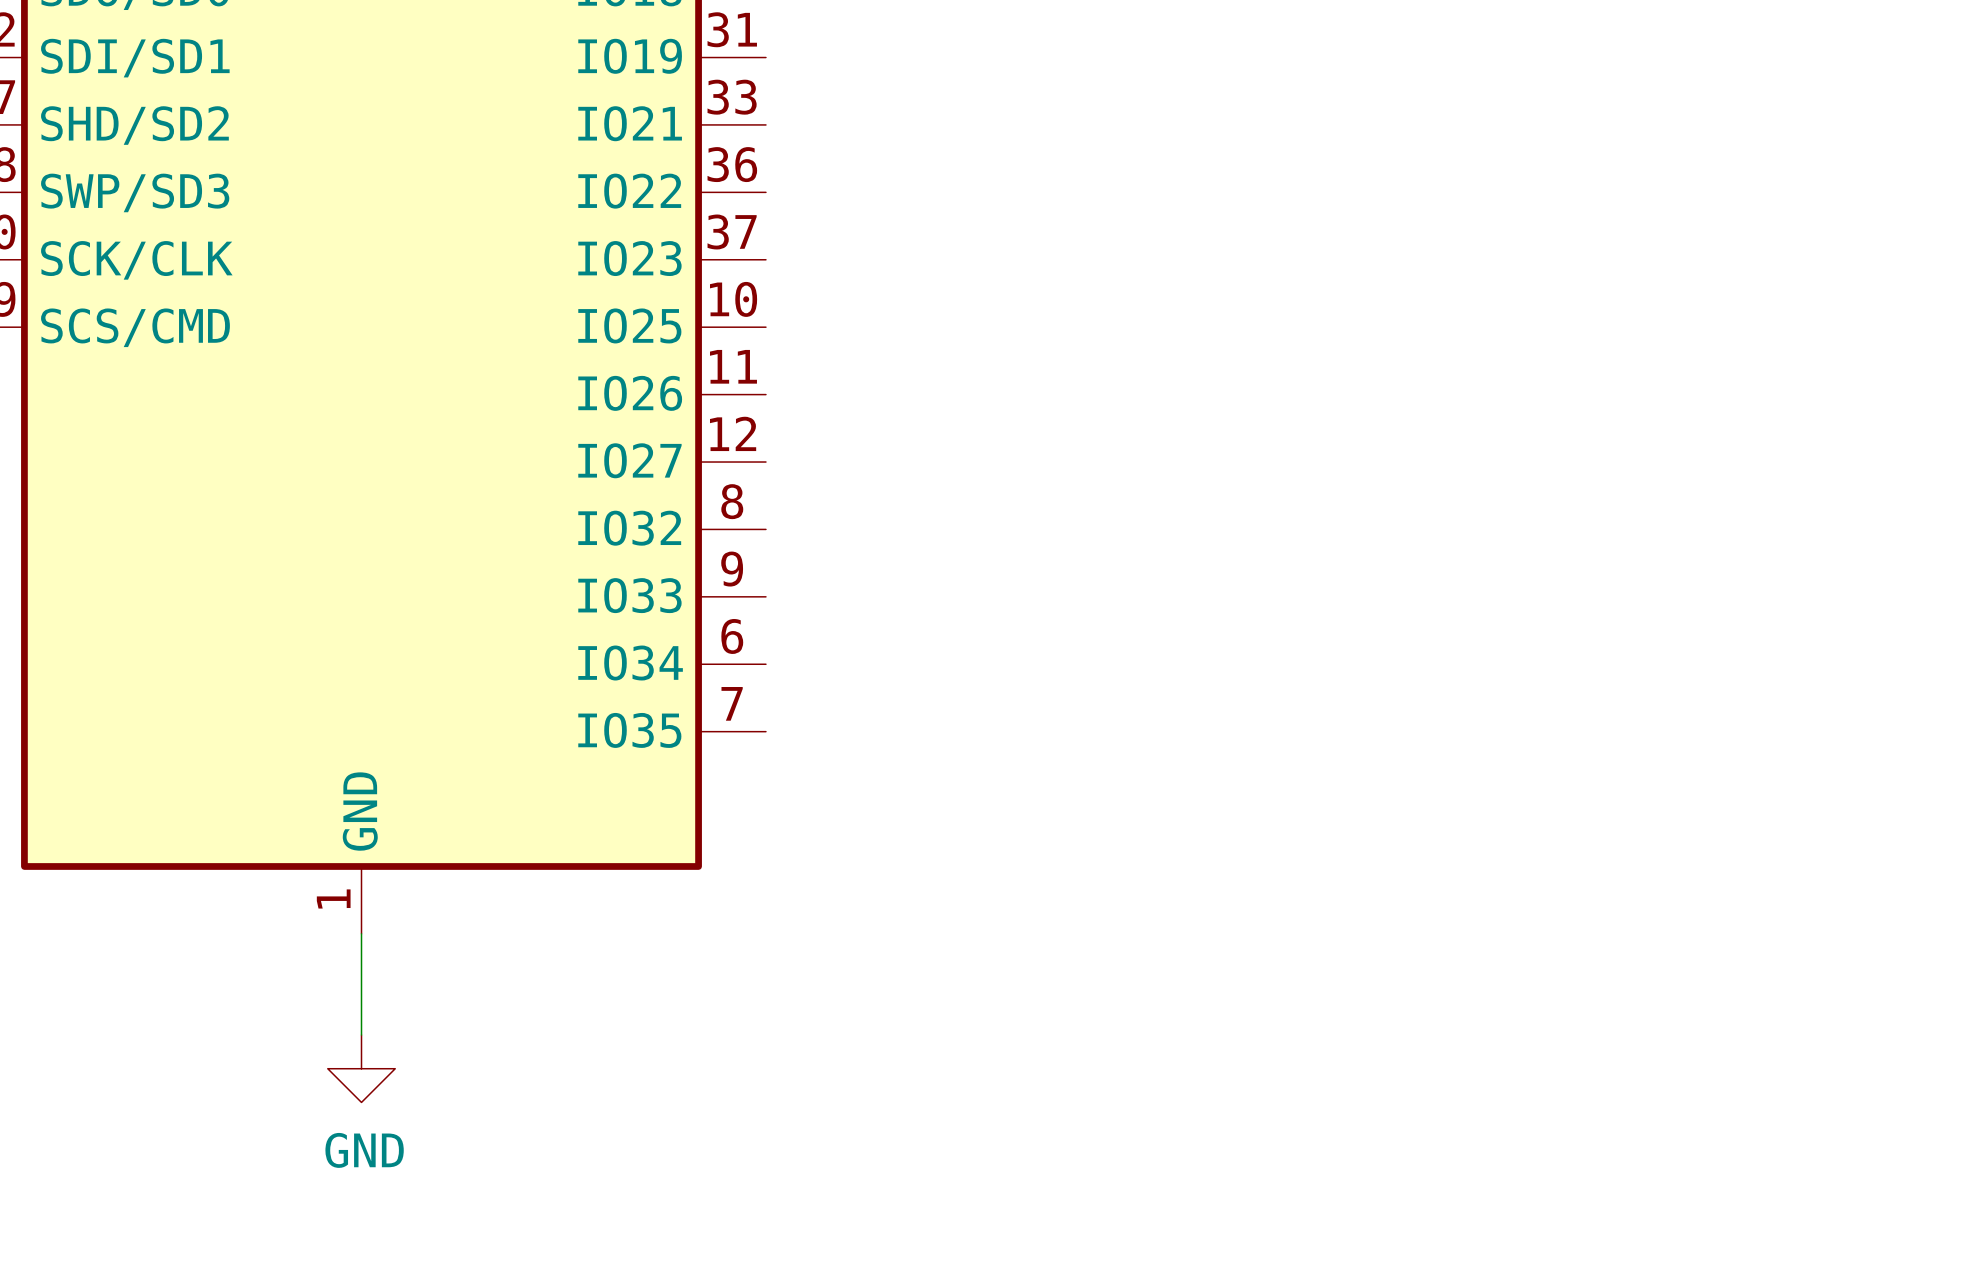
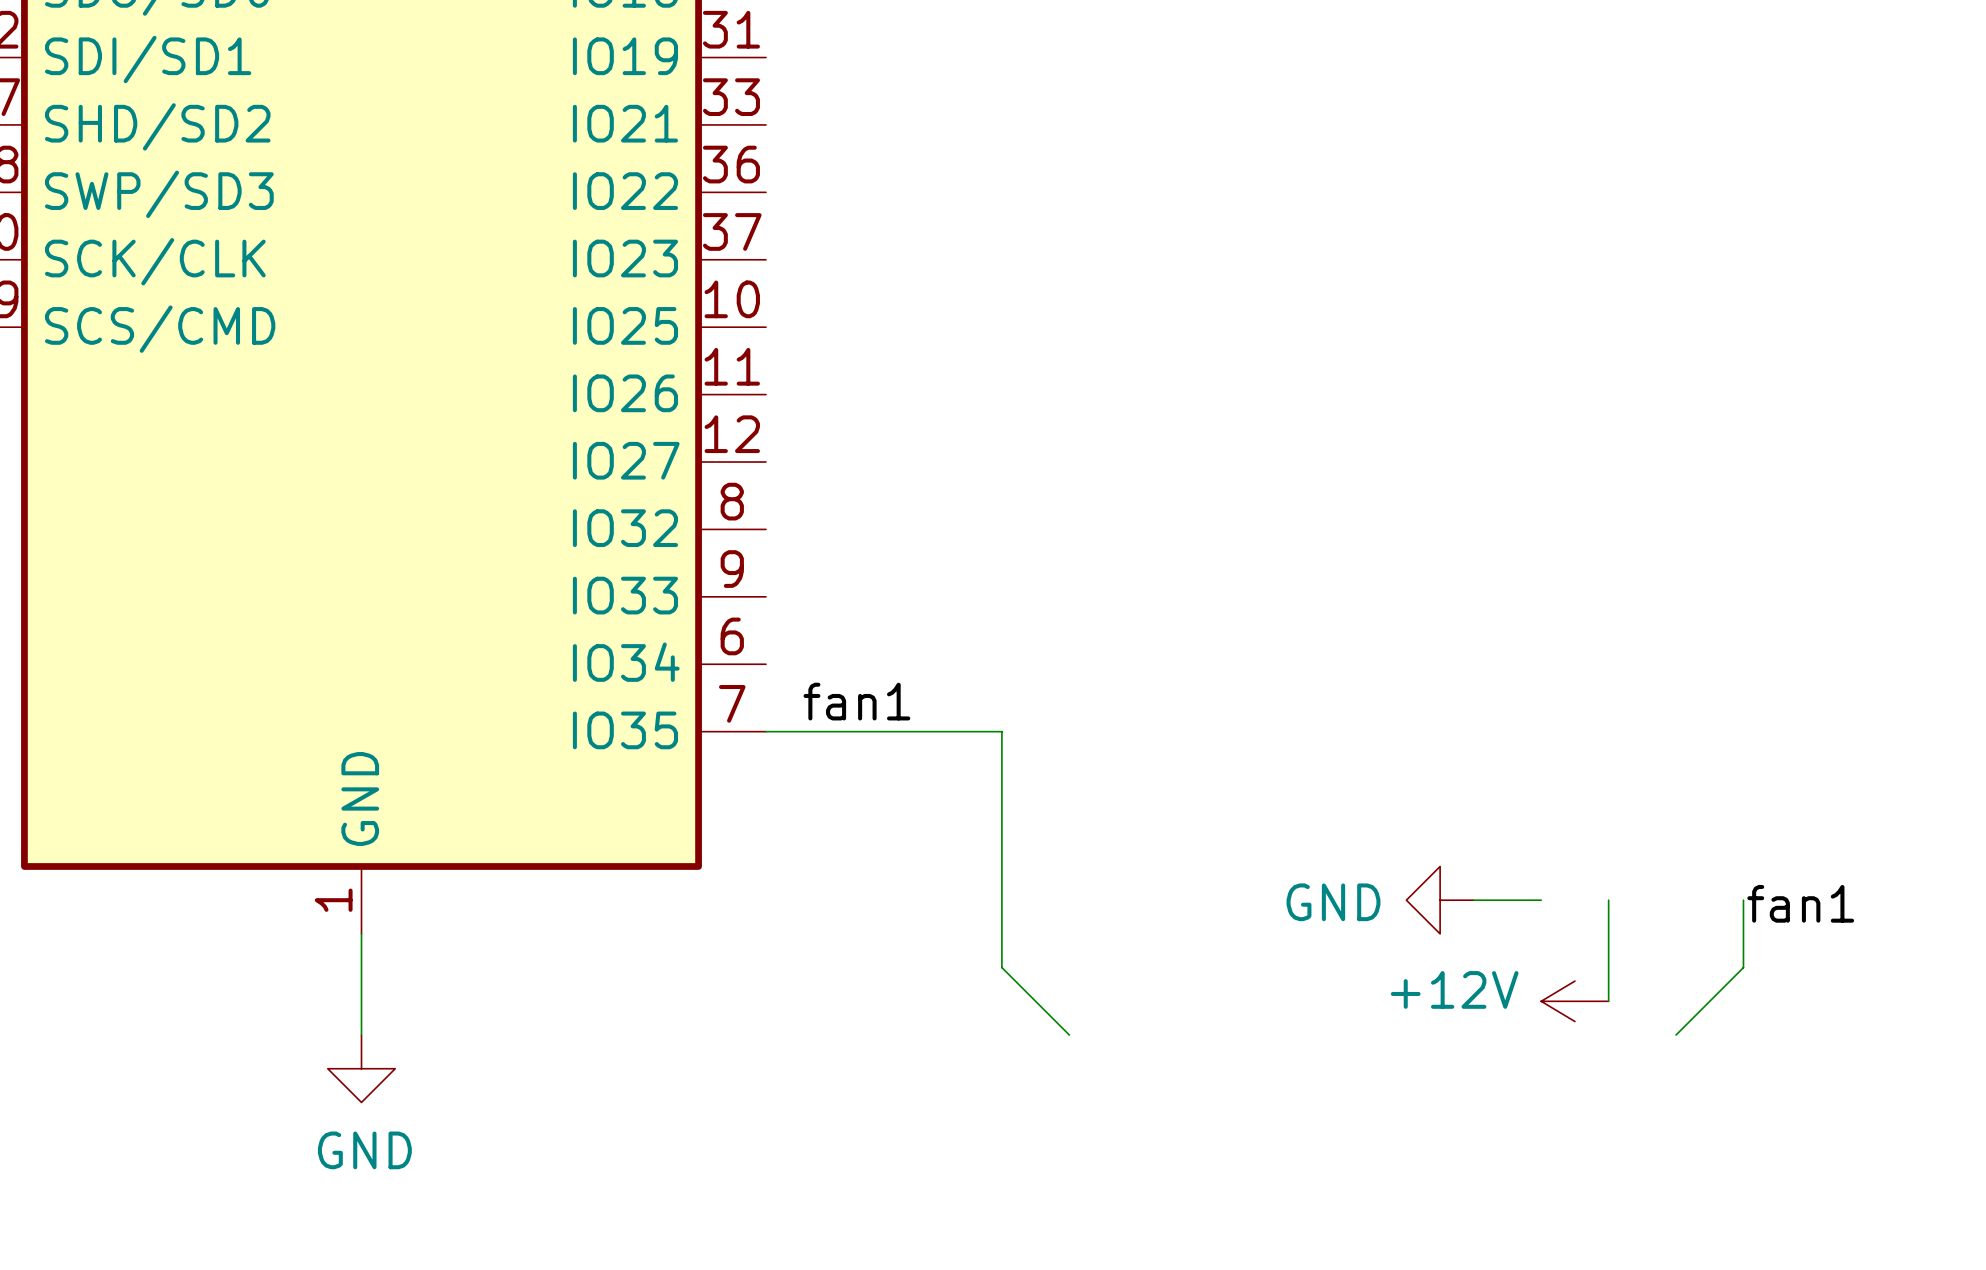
label: none -> fan1 (856, 701)
wire: none -> (765, 731) (1001, 731) (1001, 967) (1069, 1035)
power symbol: none -> GND (1440, 900)
wire: none -> (1473, 900) (1541, 900)
wire: none -> (1608, 900) (1608, 1001)
wire: none -> (1743, 900) (1743, 967) (1676, 1035)
label: none -> fan1 (1800, 903)
power symbol: none -> +12V (1574, 1001)

